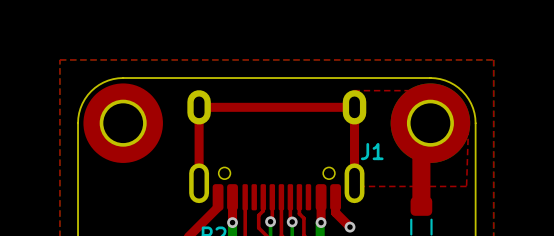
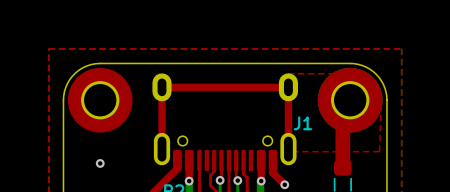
via: none -> (100, 163)

